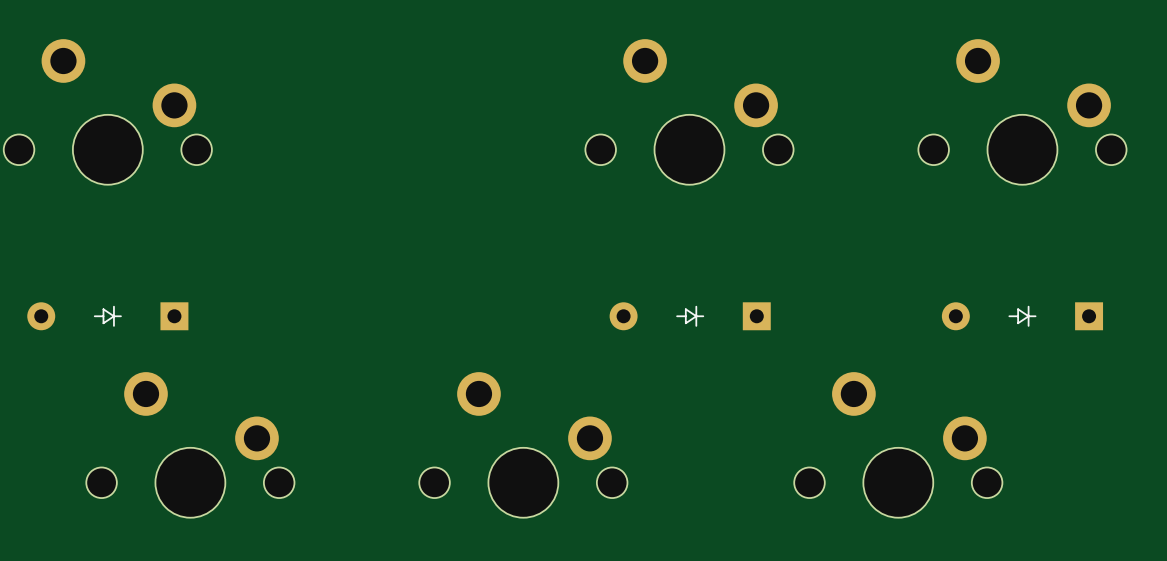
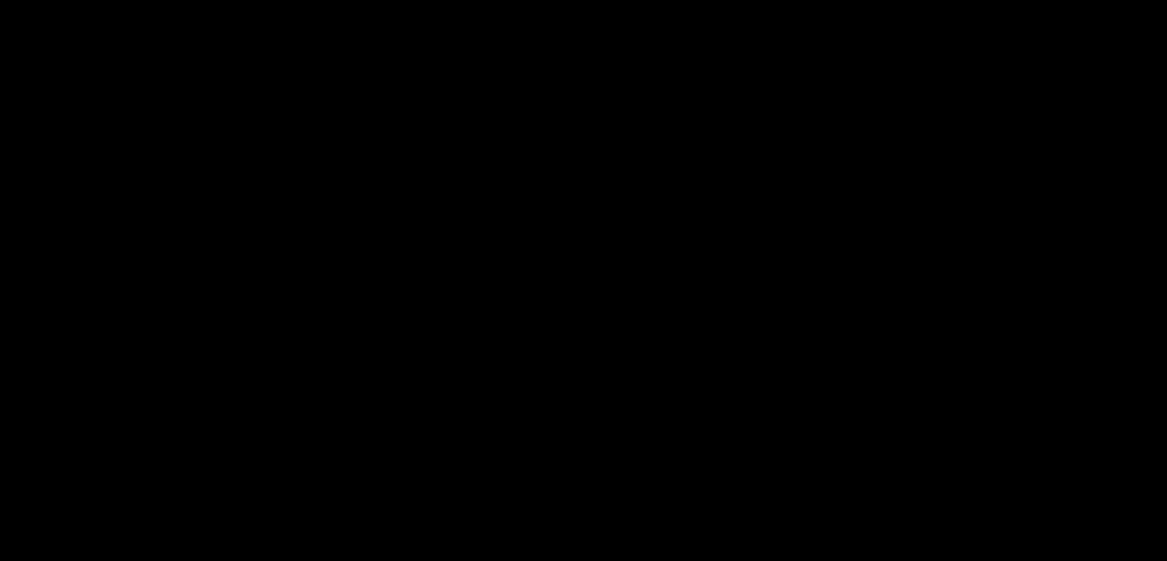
part: (107, 111) -> none
part: (689, 111) -> none
part: (1022, 111) -> none
part: (107, 316) -> none
part: (690, 316) -> none
part: (1022, 316) -> none
part: (190, 444) -> none
part: (523, 444) -> none
part: (898, 444) -> none

